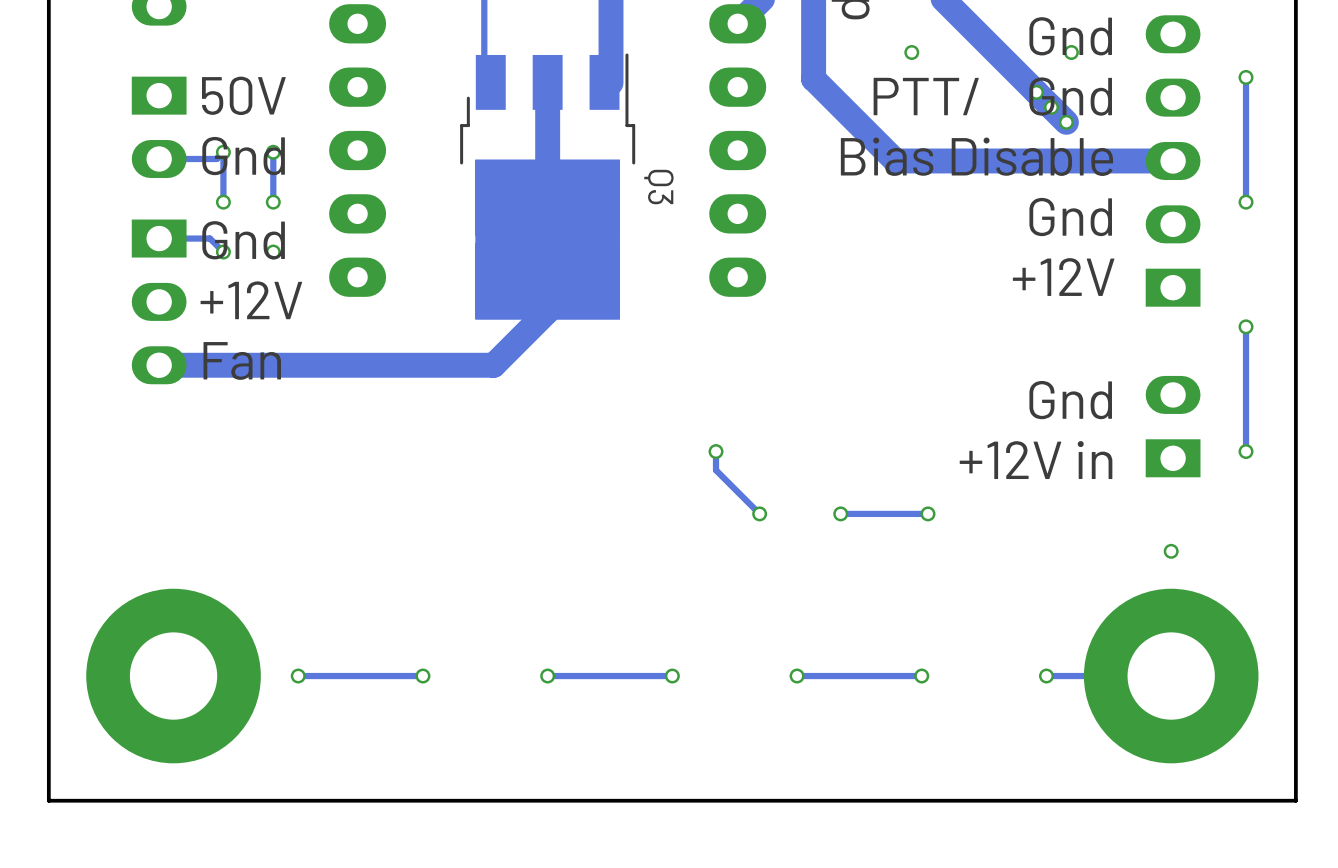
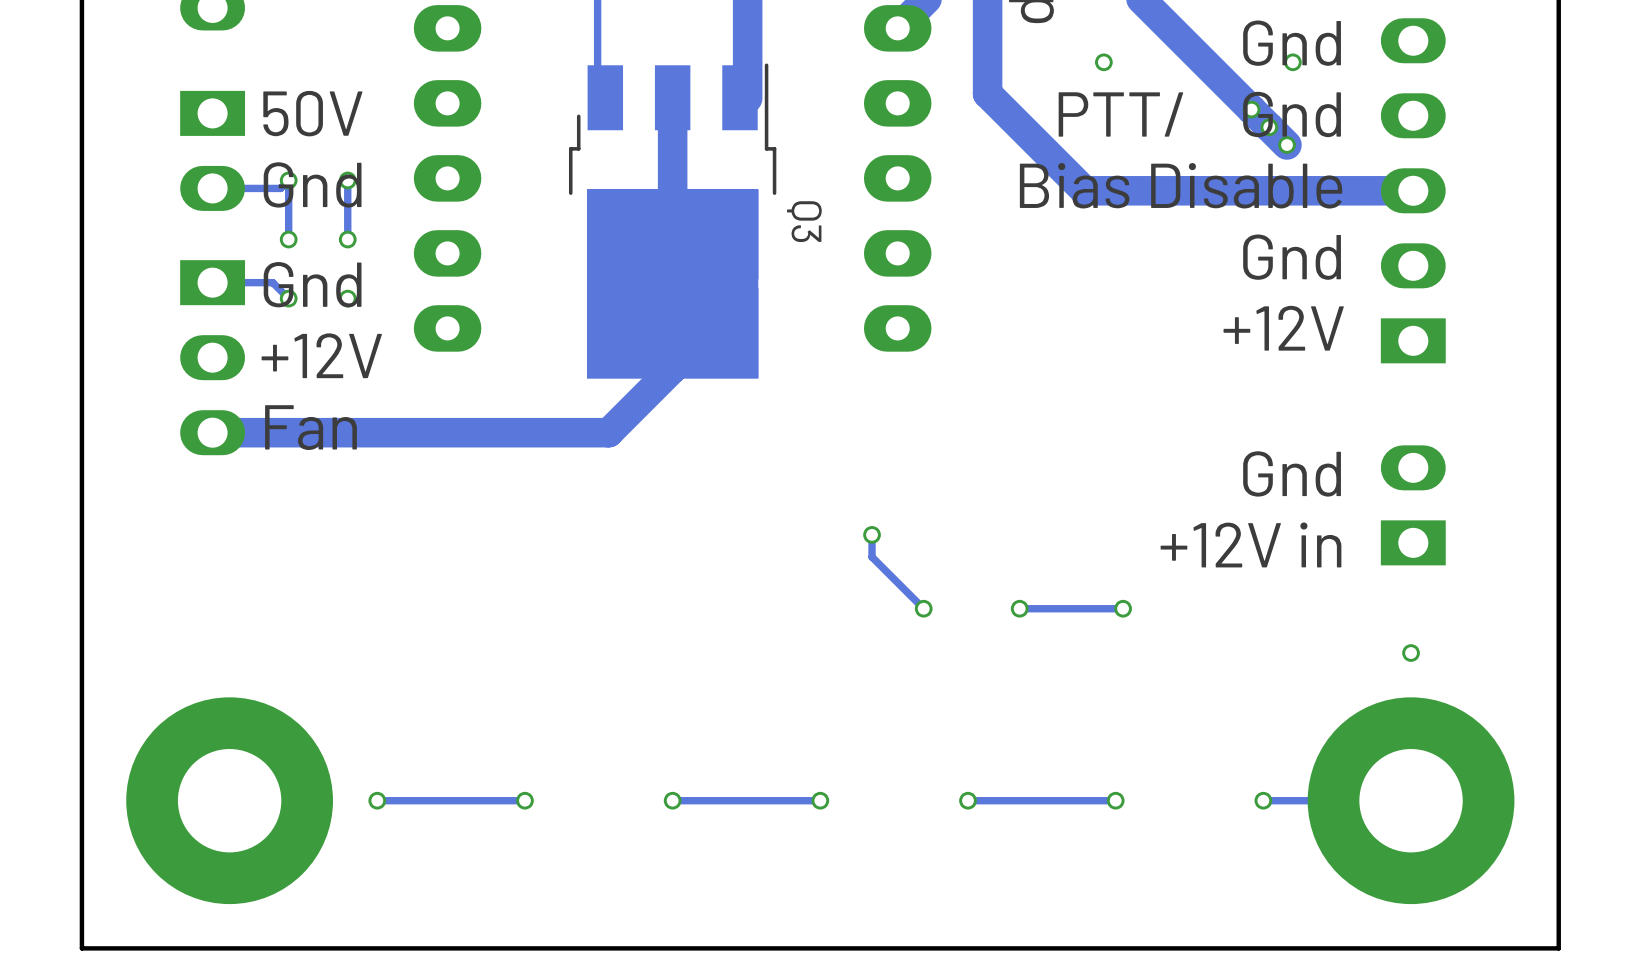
track: (1246, 77) (1246, 202) -> none
via: (1246, 77) -> none
via: (1246, 202) -> none
track: (1246, 326) (1246, 451) -> none
via: (1246, 326) -> none
via: (1246, 451) -> none

